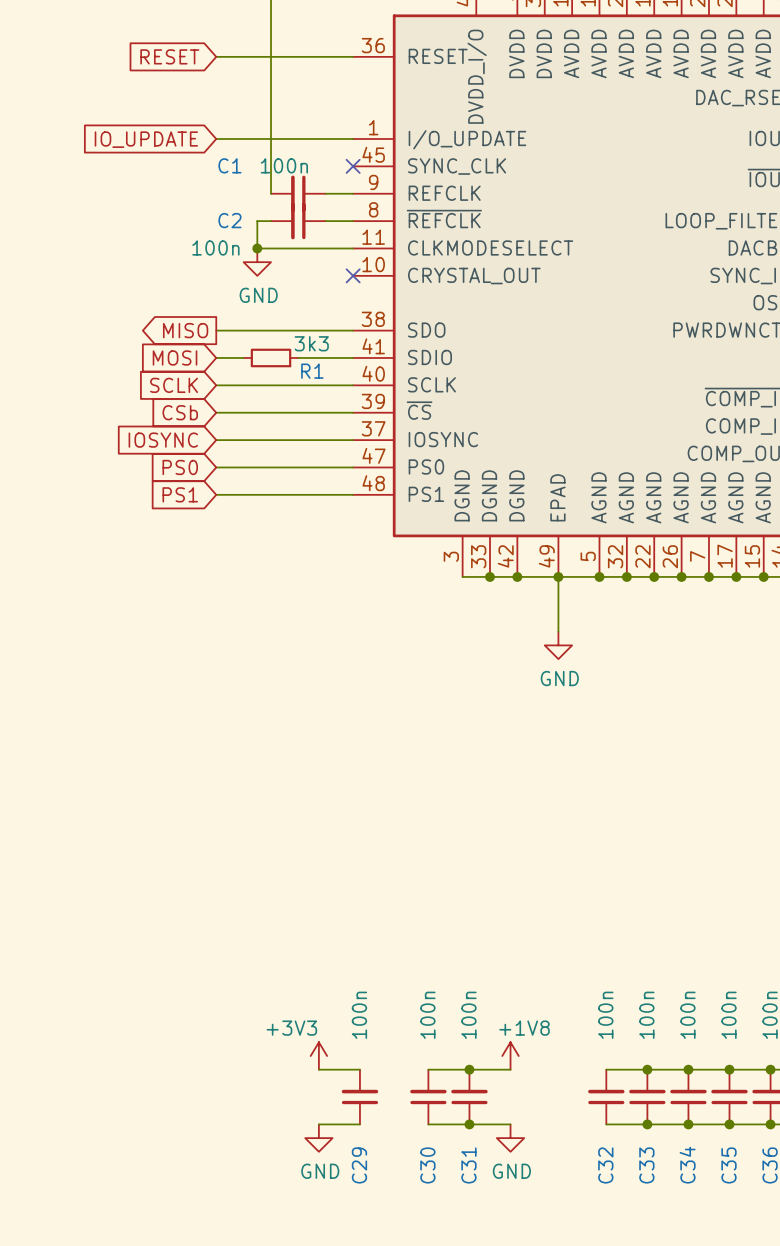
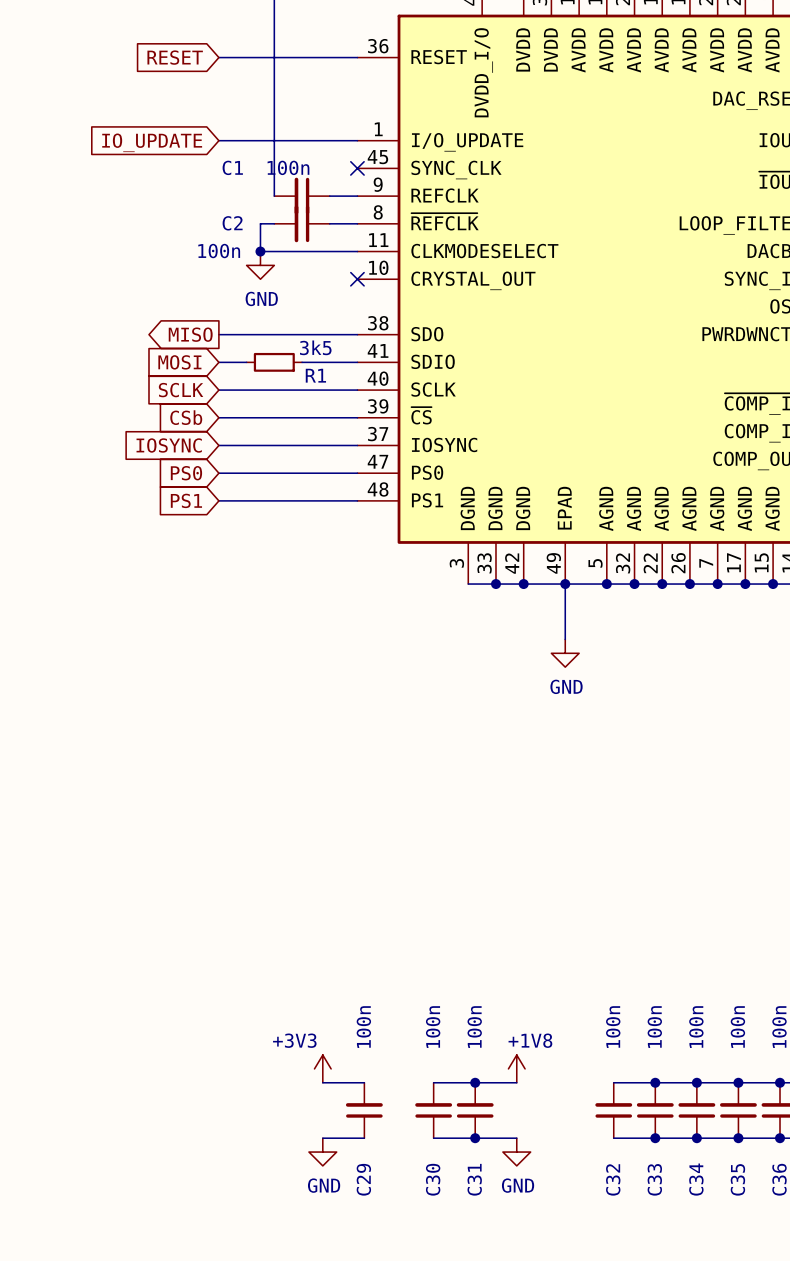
R1 value: 3k3 (311, 343) -> 3k5 (315, 347)

